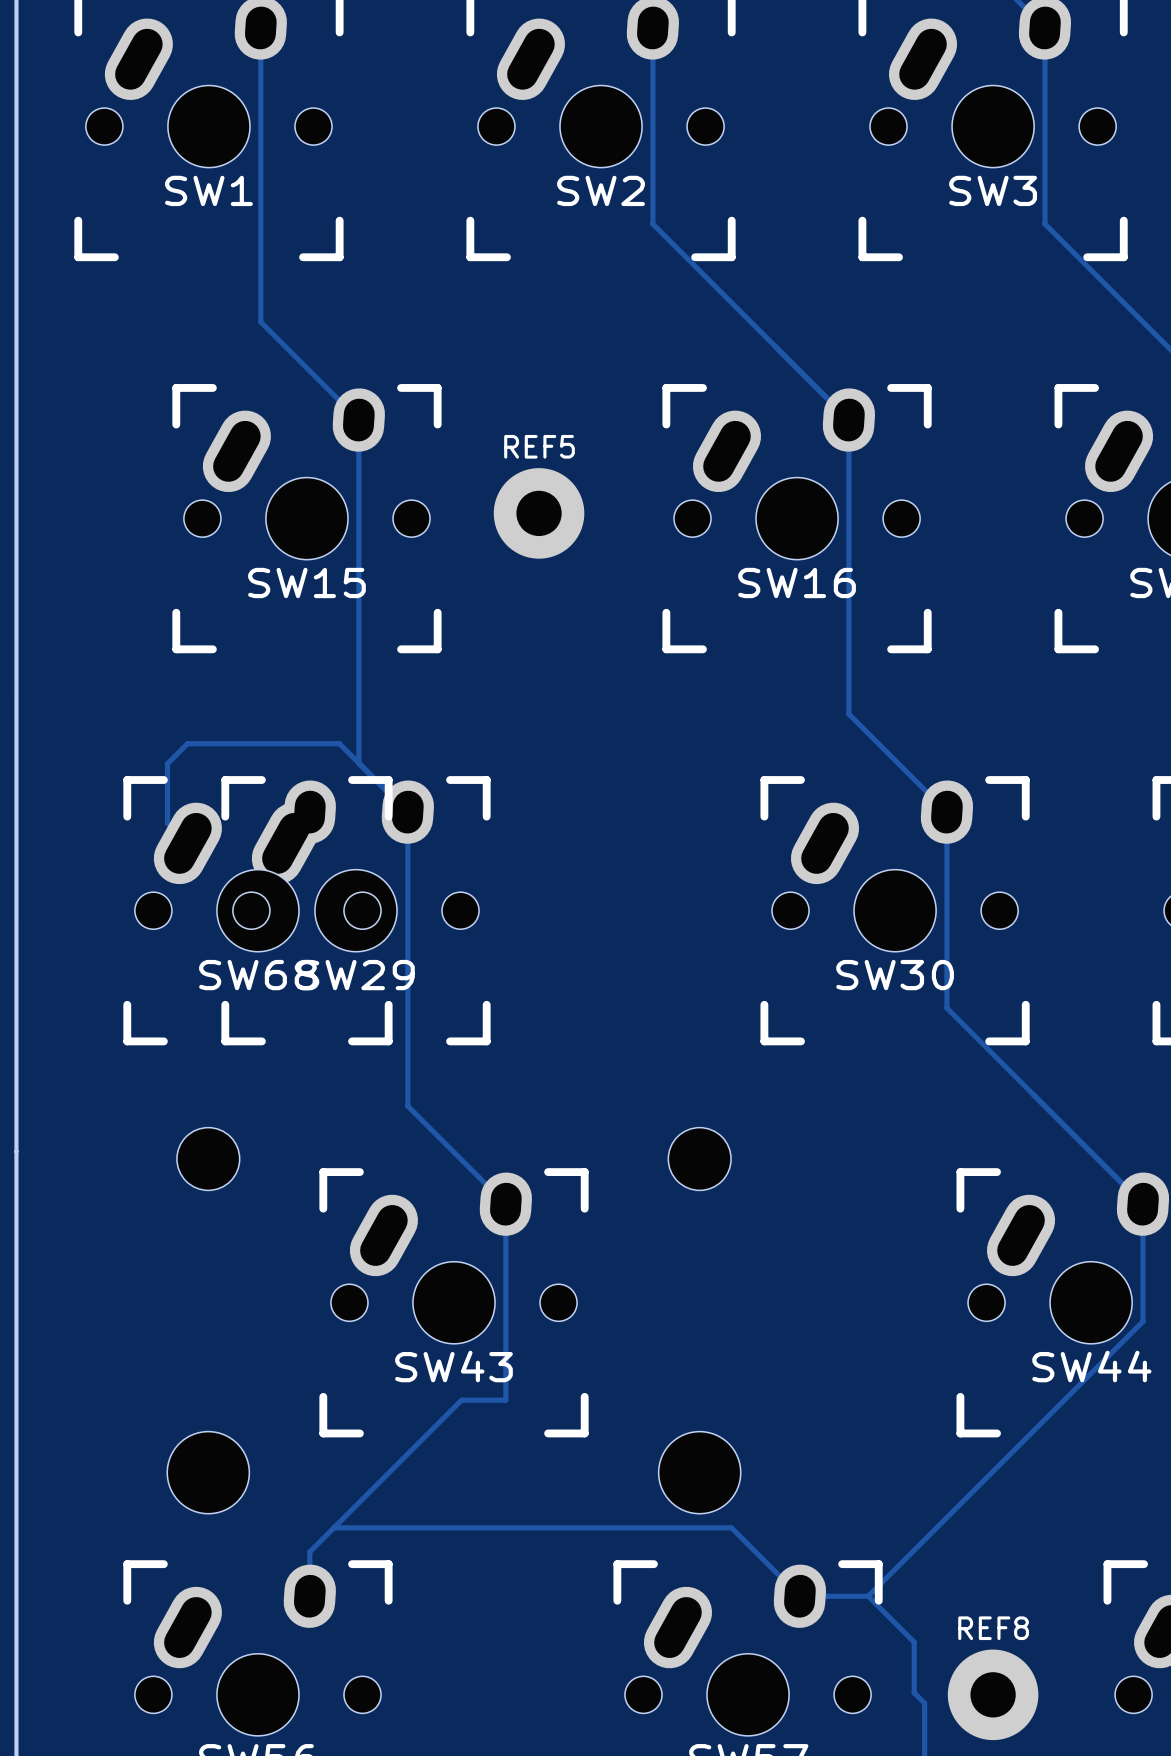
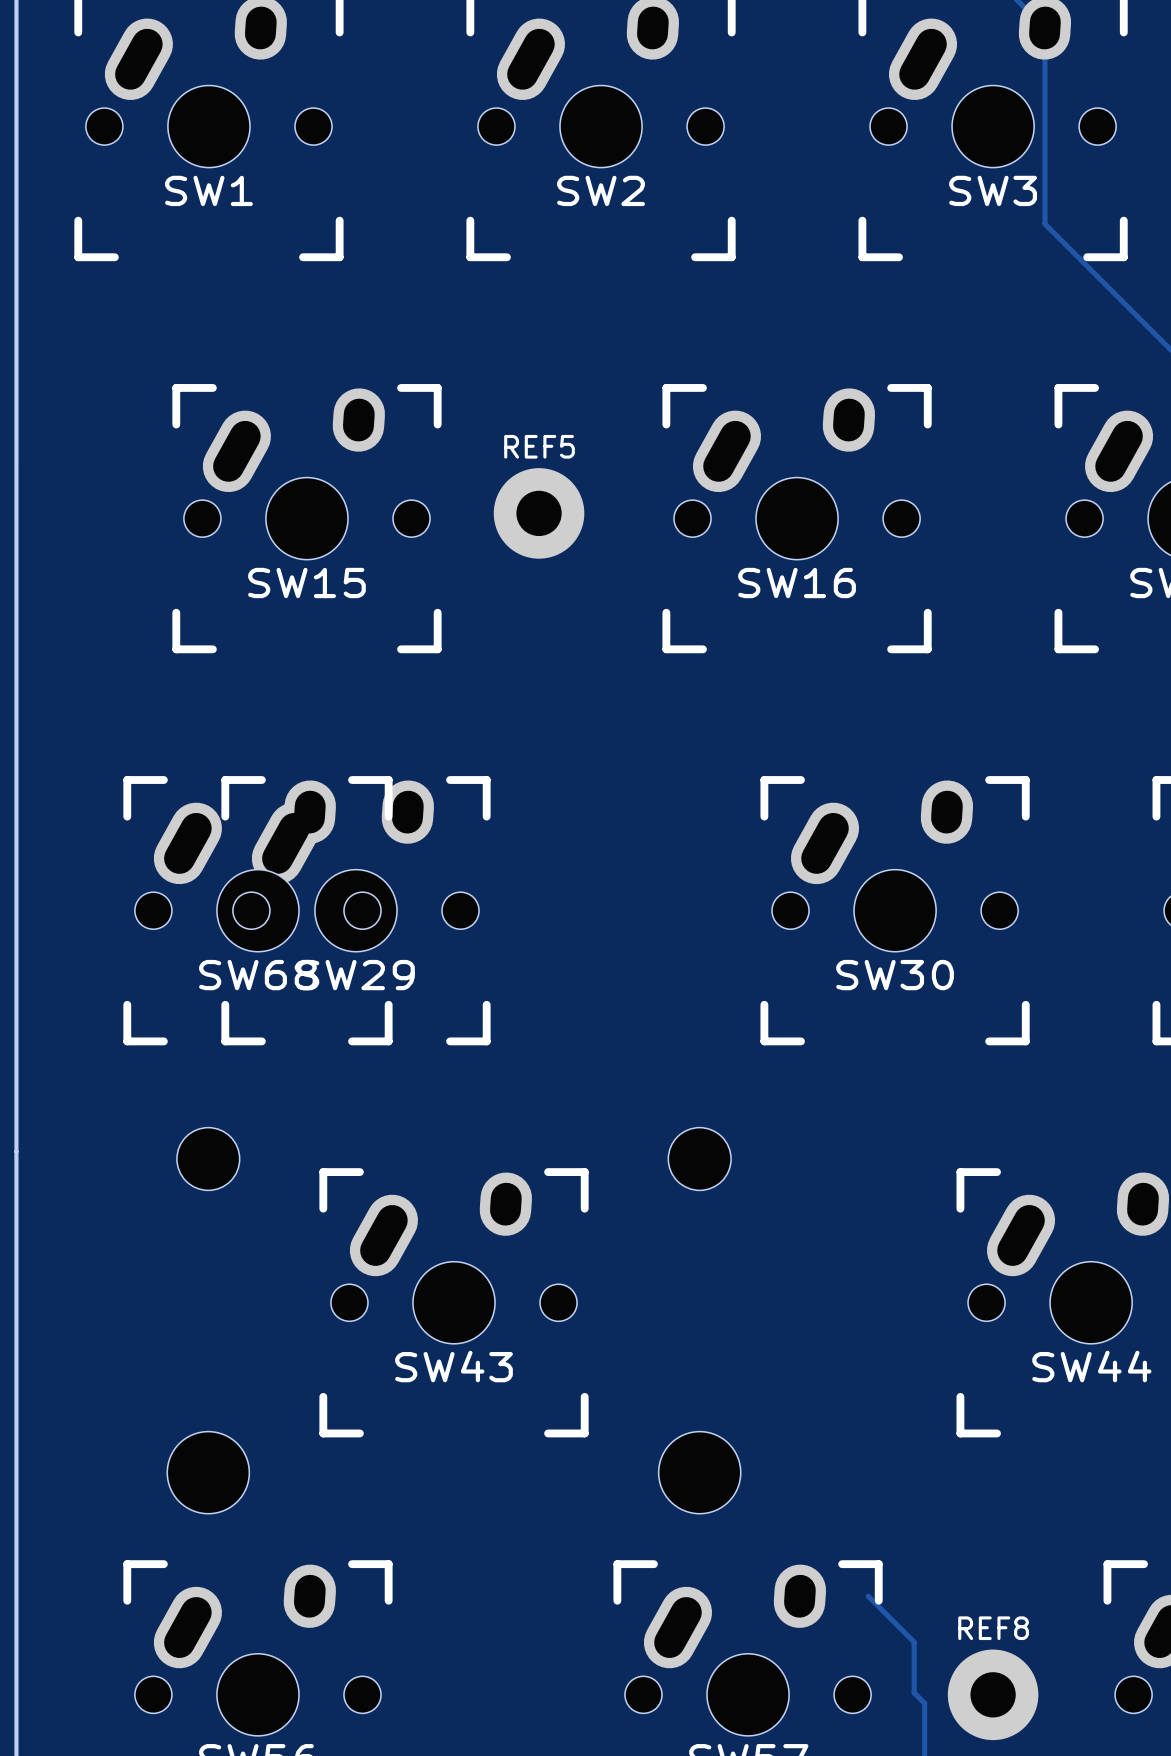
track: (260, 27) (260, 322) (358, 420) (358, 763) -> none
track: (652, 27) (652, 224) (848, 420) (848, 714) (946, 812) (946, 1008) (1142, 1204) (1142, 1321) (868, 1596) (799, 1596) (731, 1527) (333, 1527) -> none
track: (187, 843) (167, 823) (167, 763) (187, 743) (339, 743) (407, 812) (407, 1106) (505, 1204) (505, 1400) (461, 1400) (309, 1551) (309, 1596) -> none

